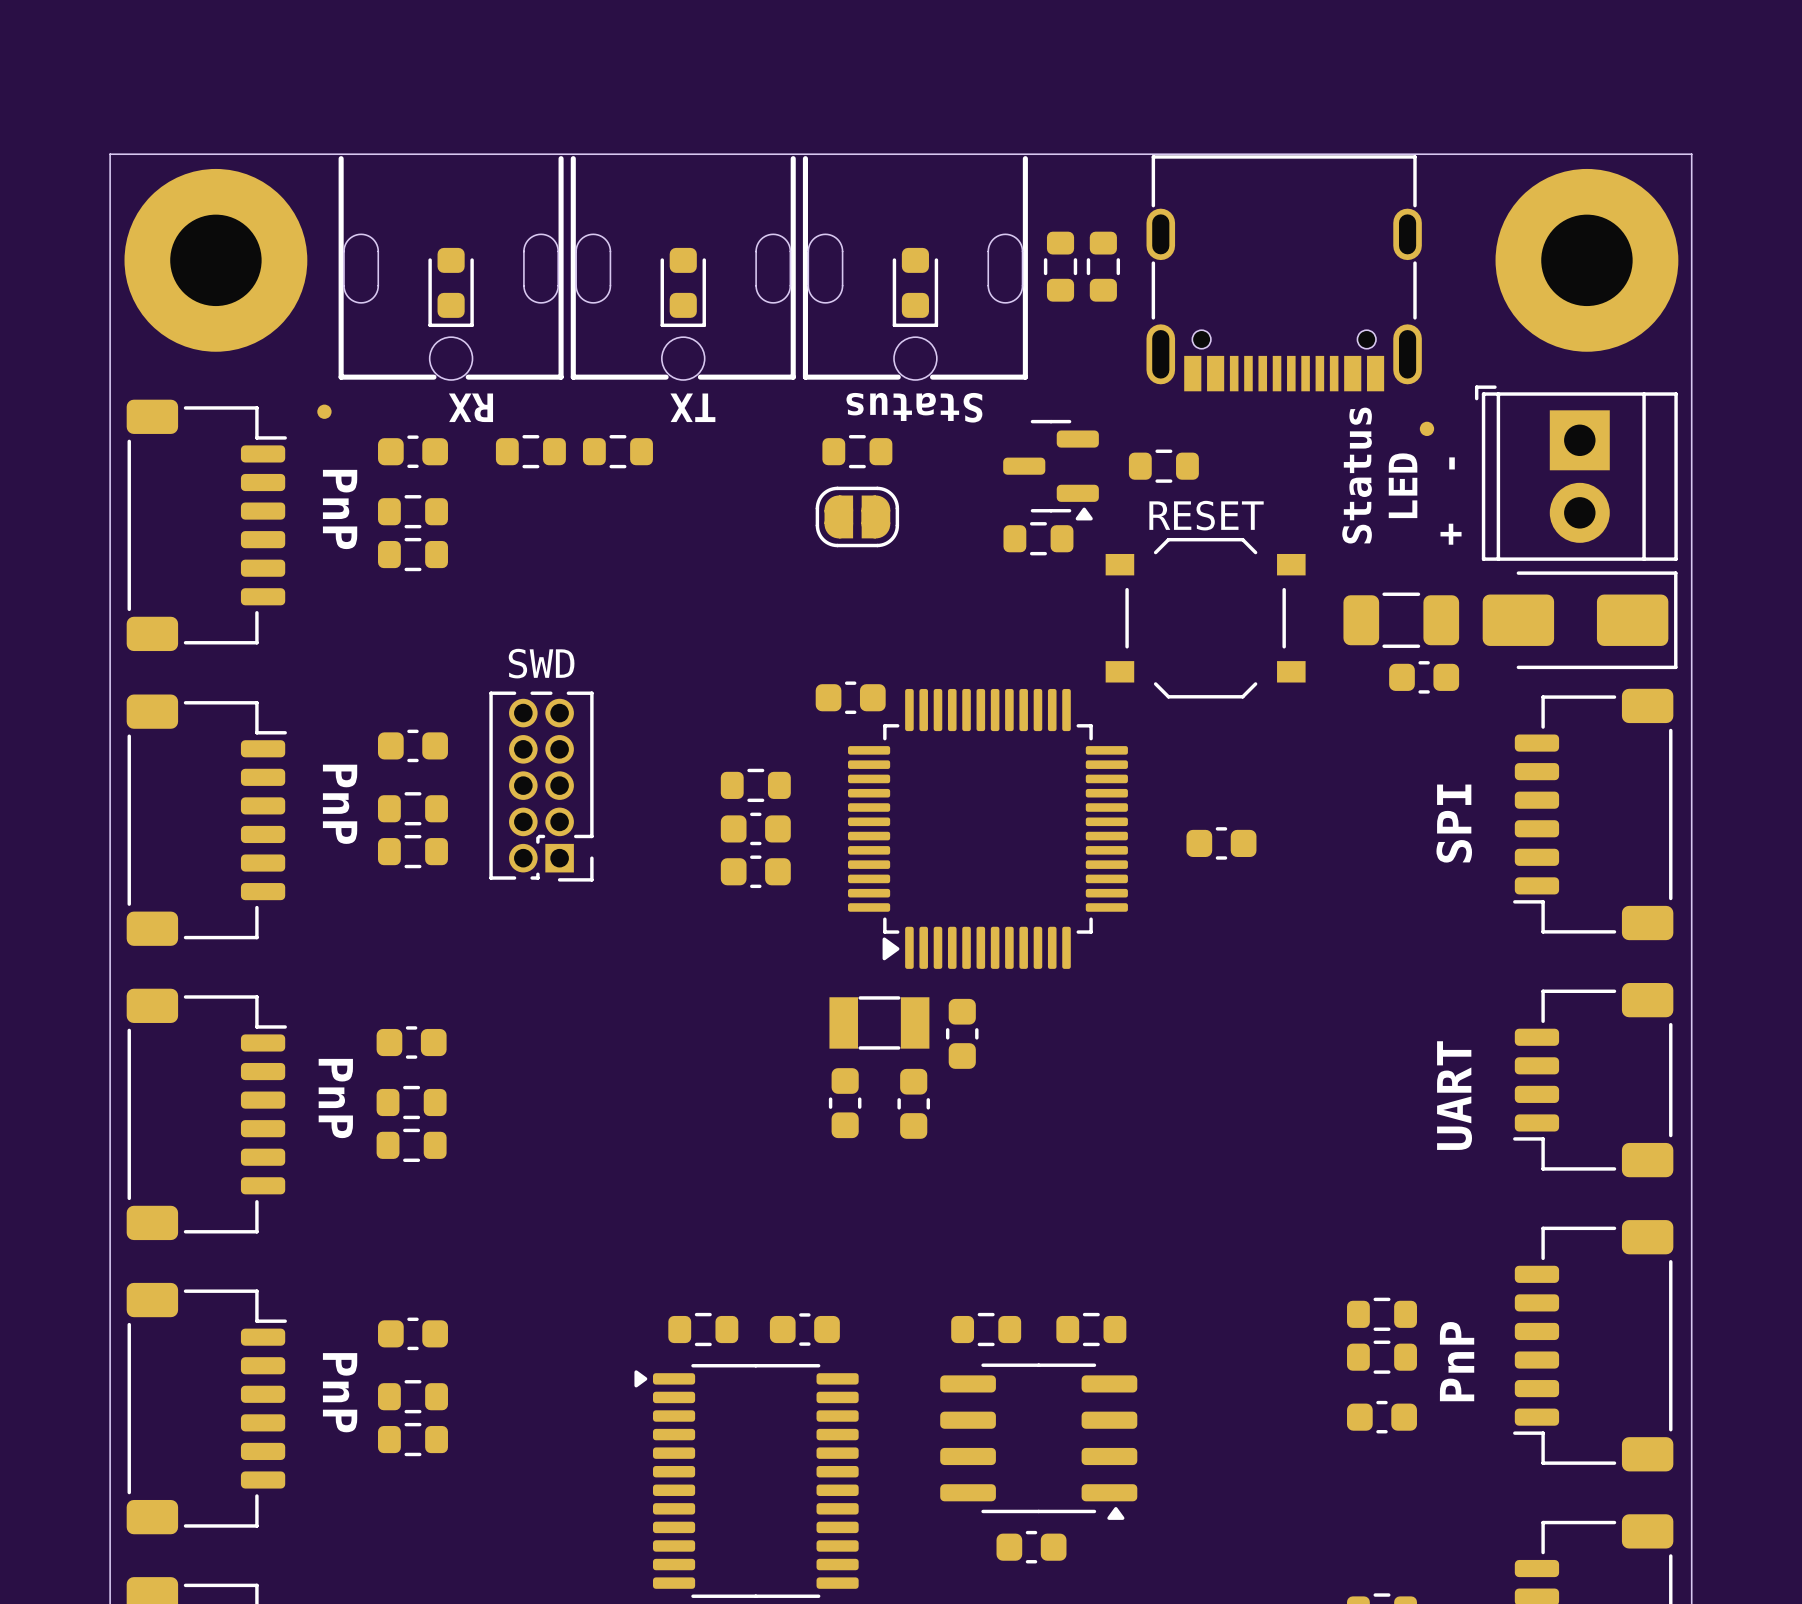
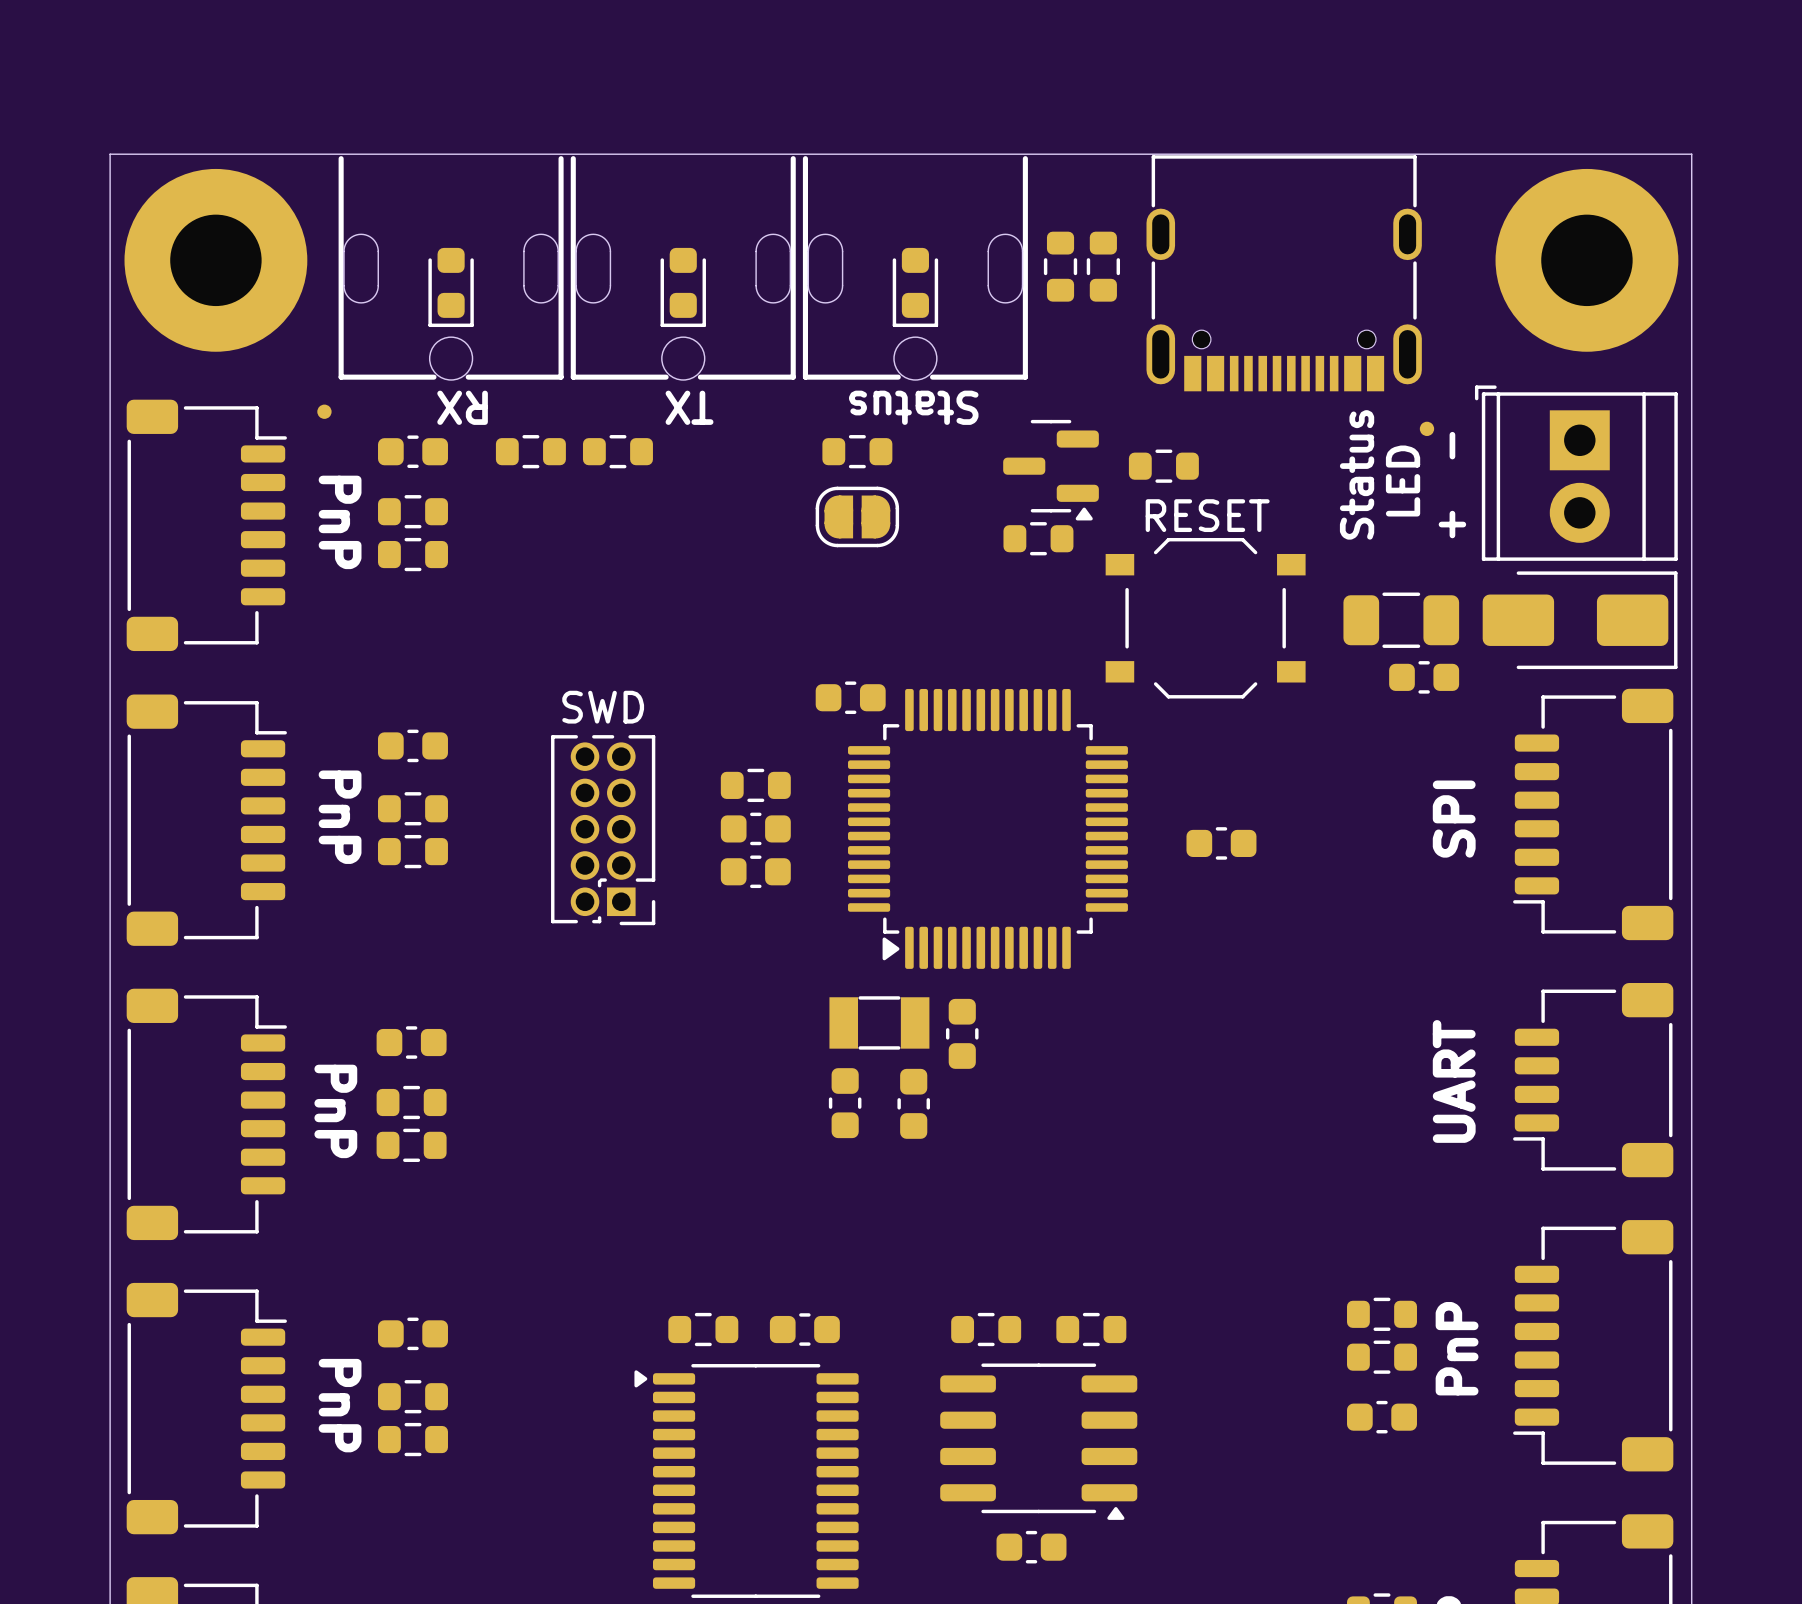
part position: (541, 786) -> (603, 830)

